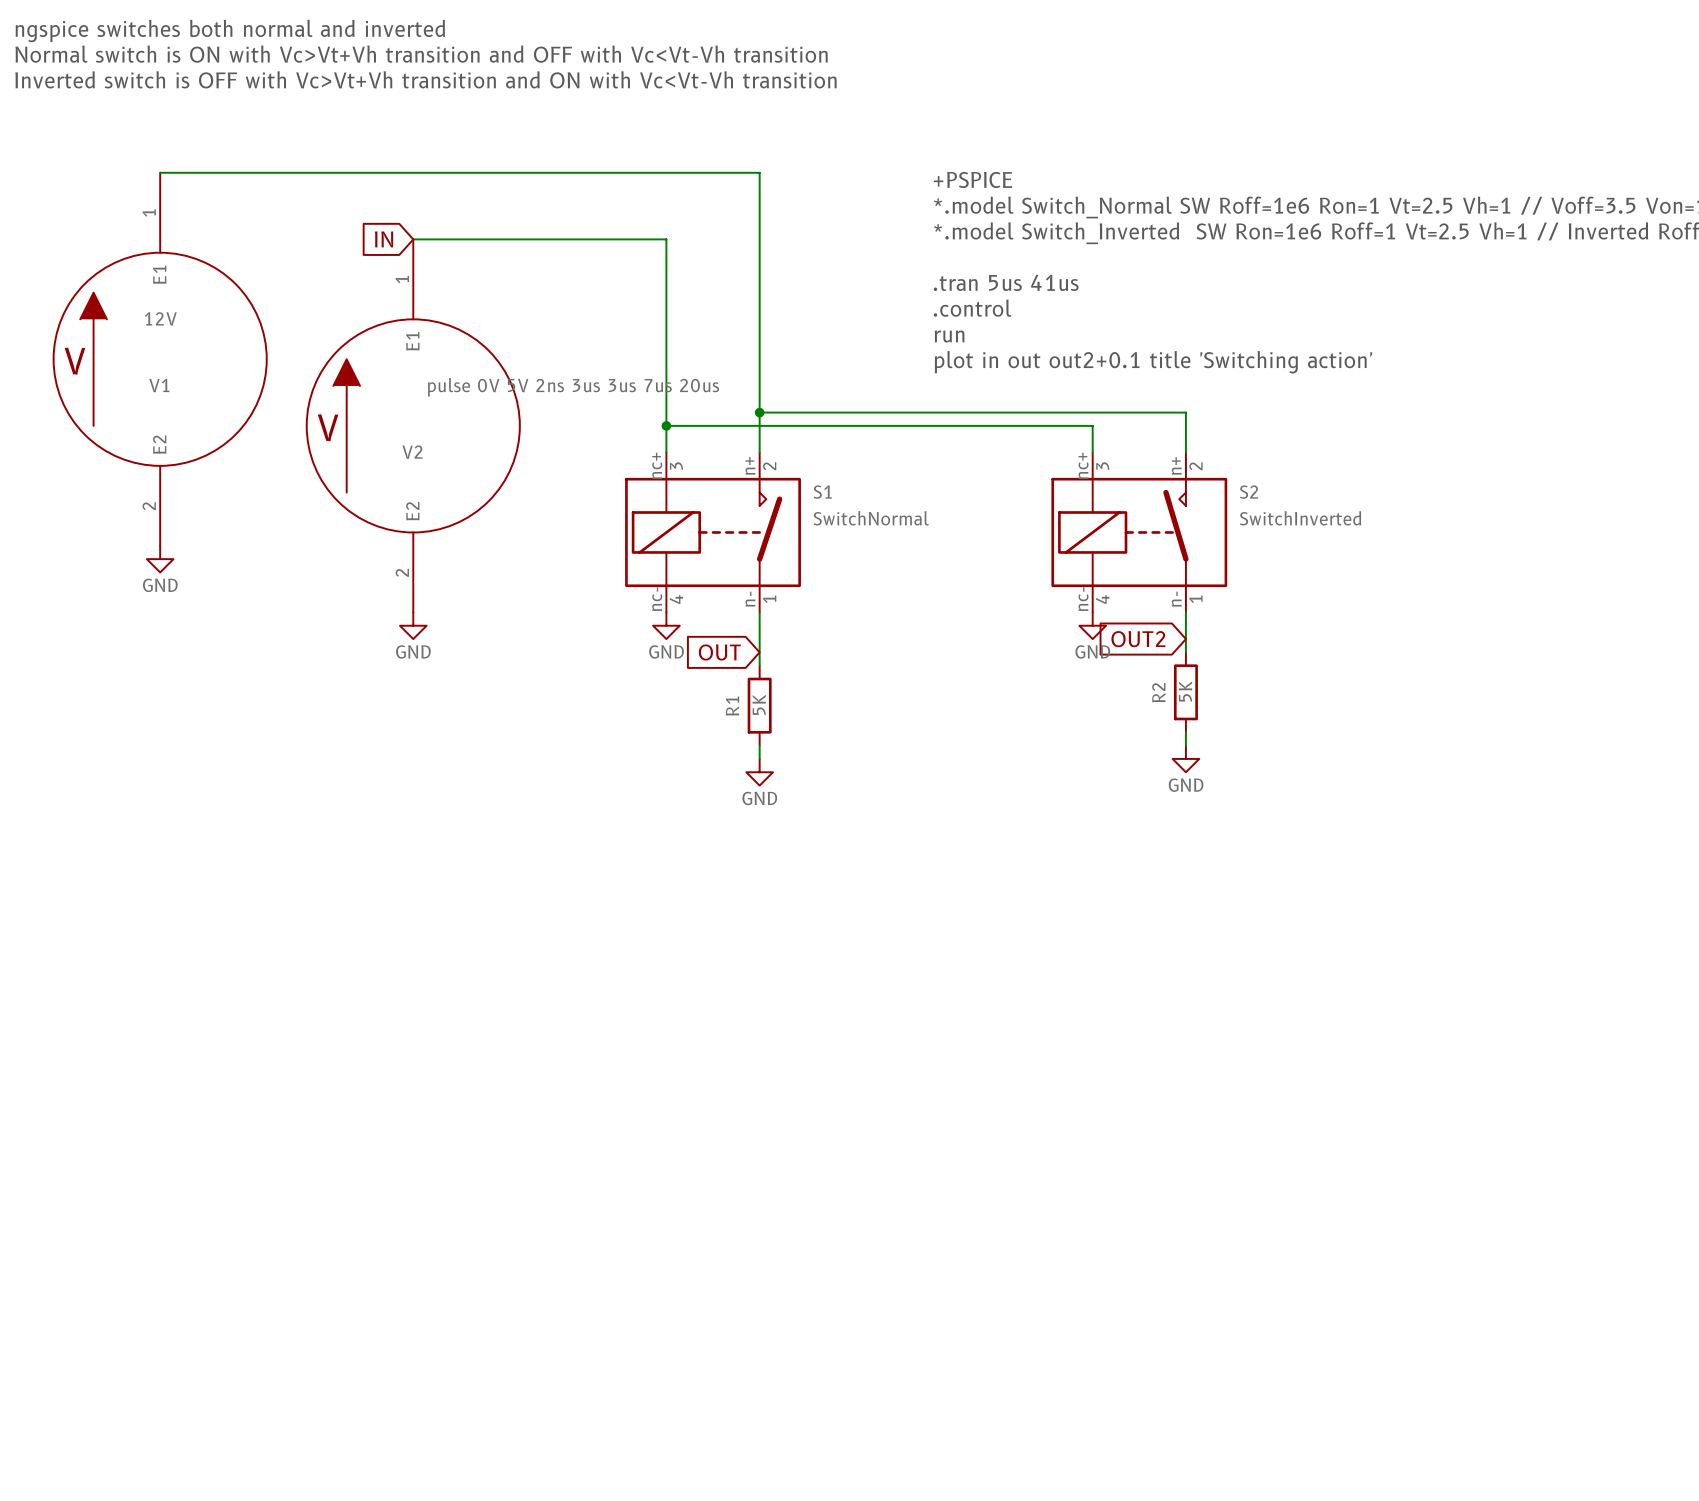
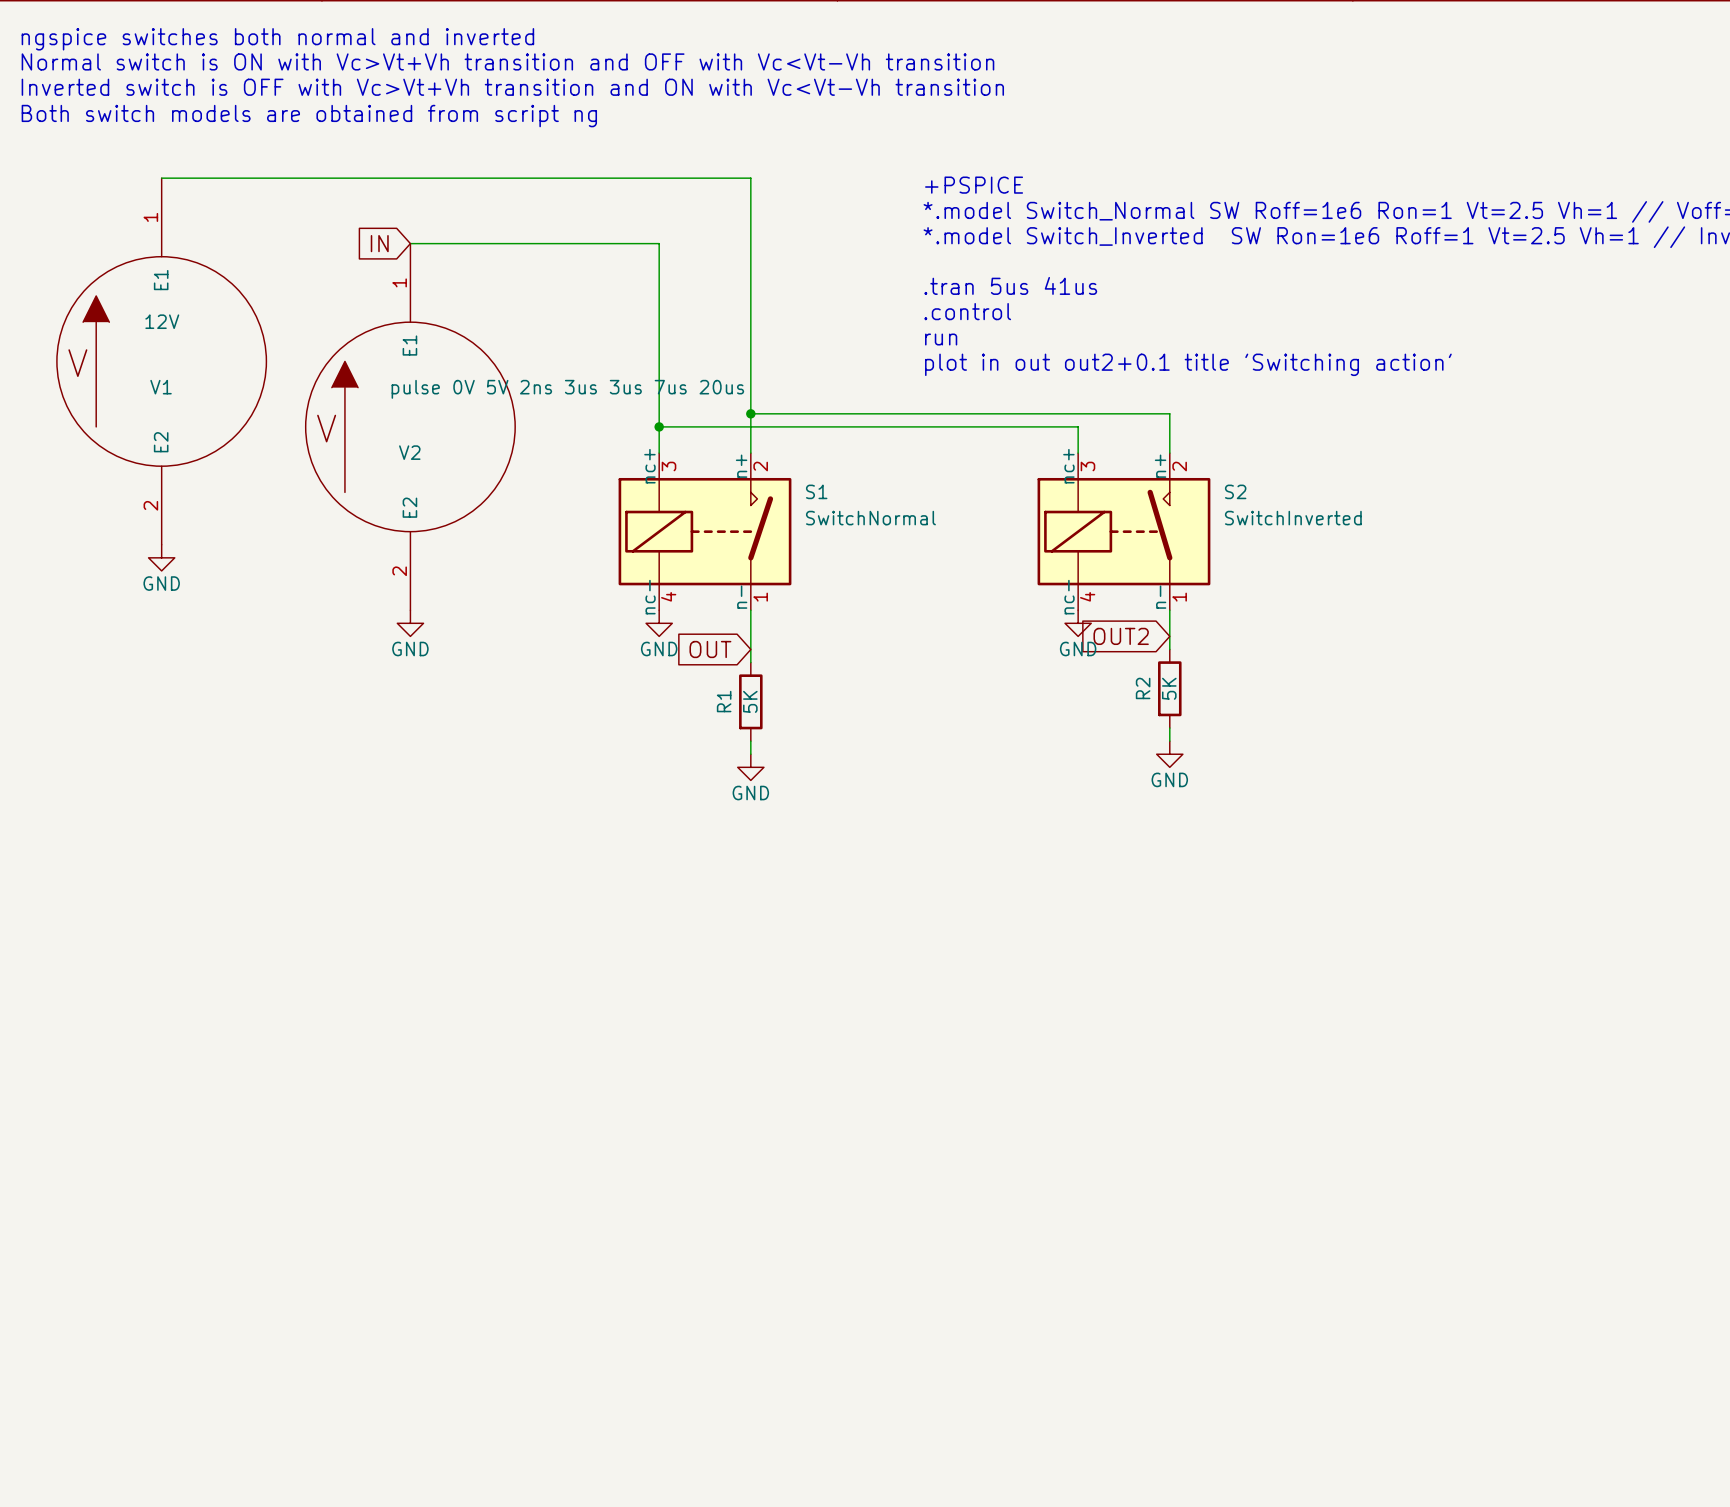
text: none -> Both switch models are obtained from script ng (309, 116)

